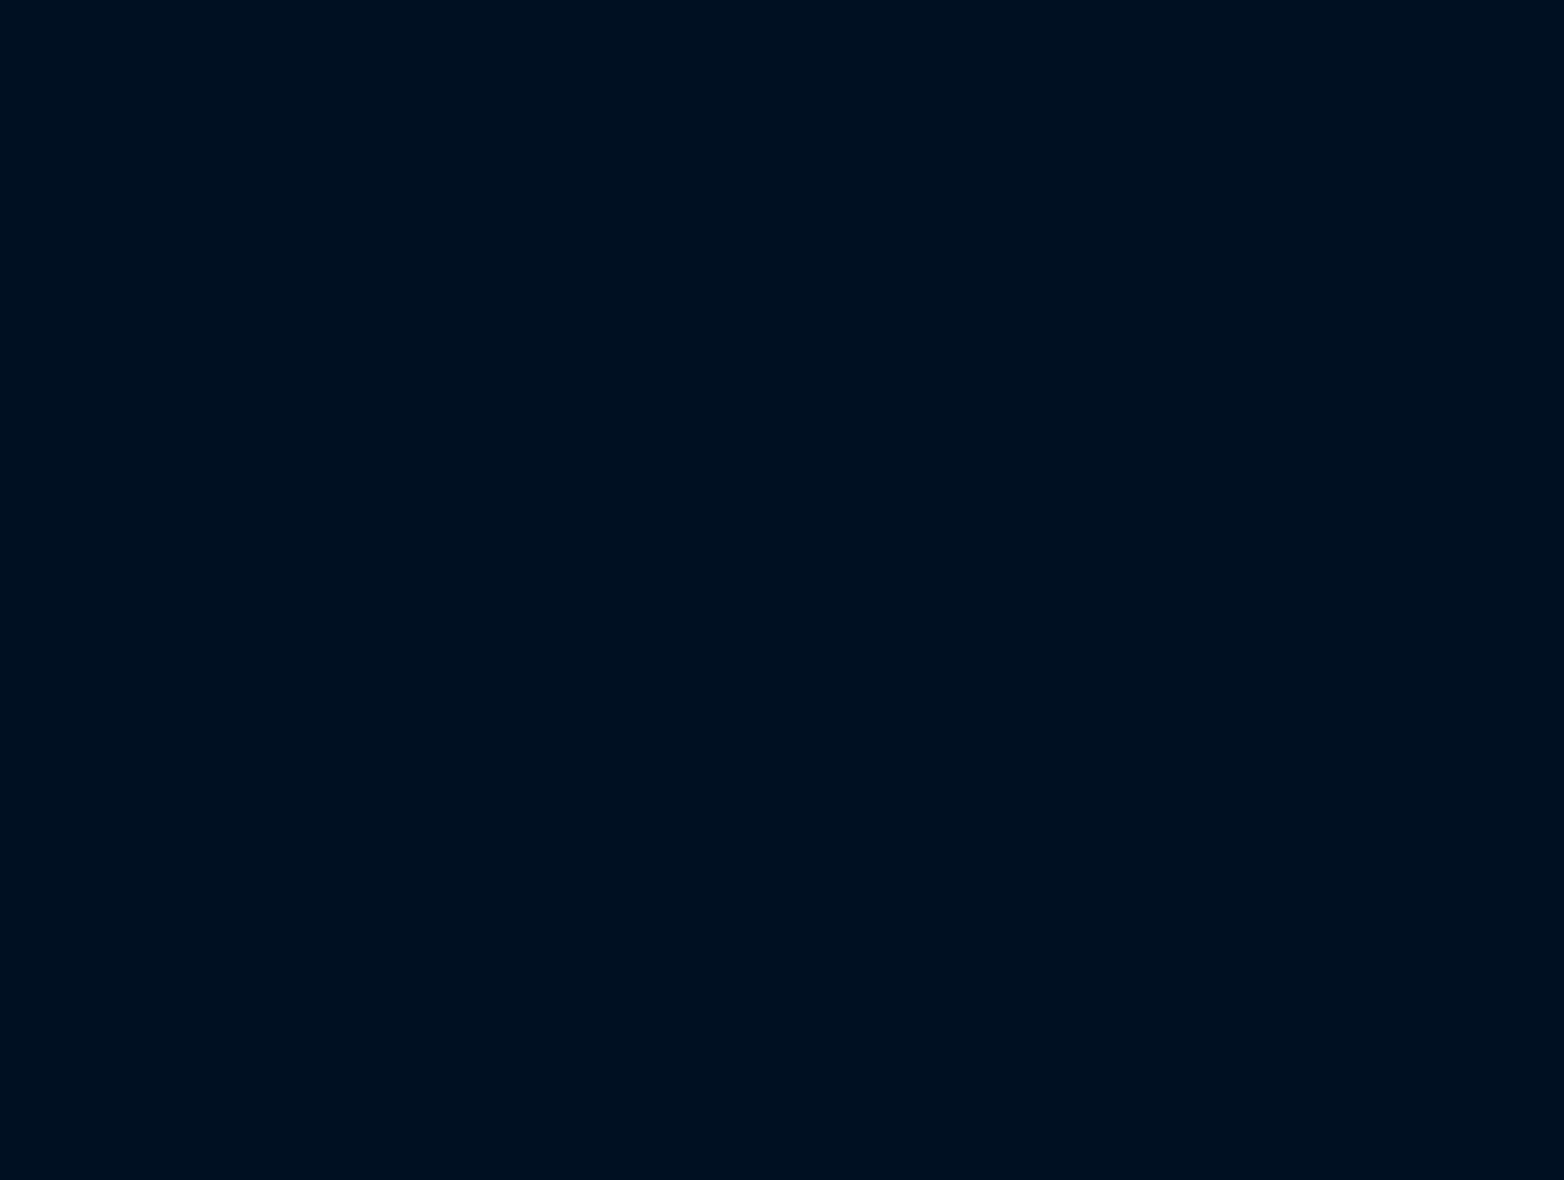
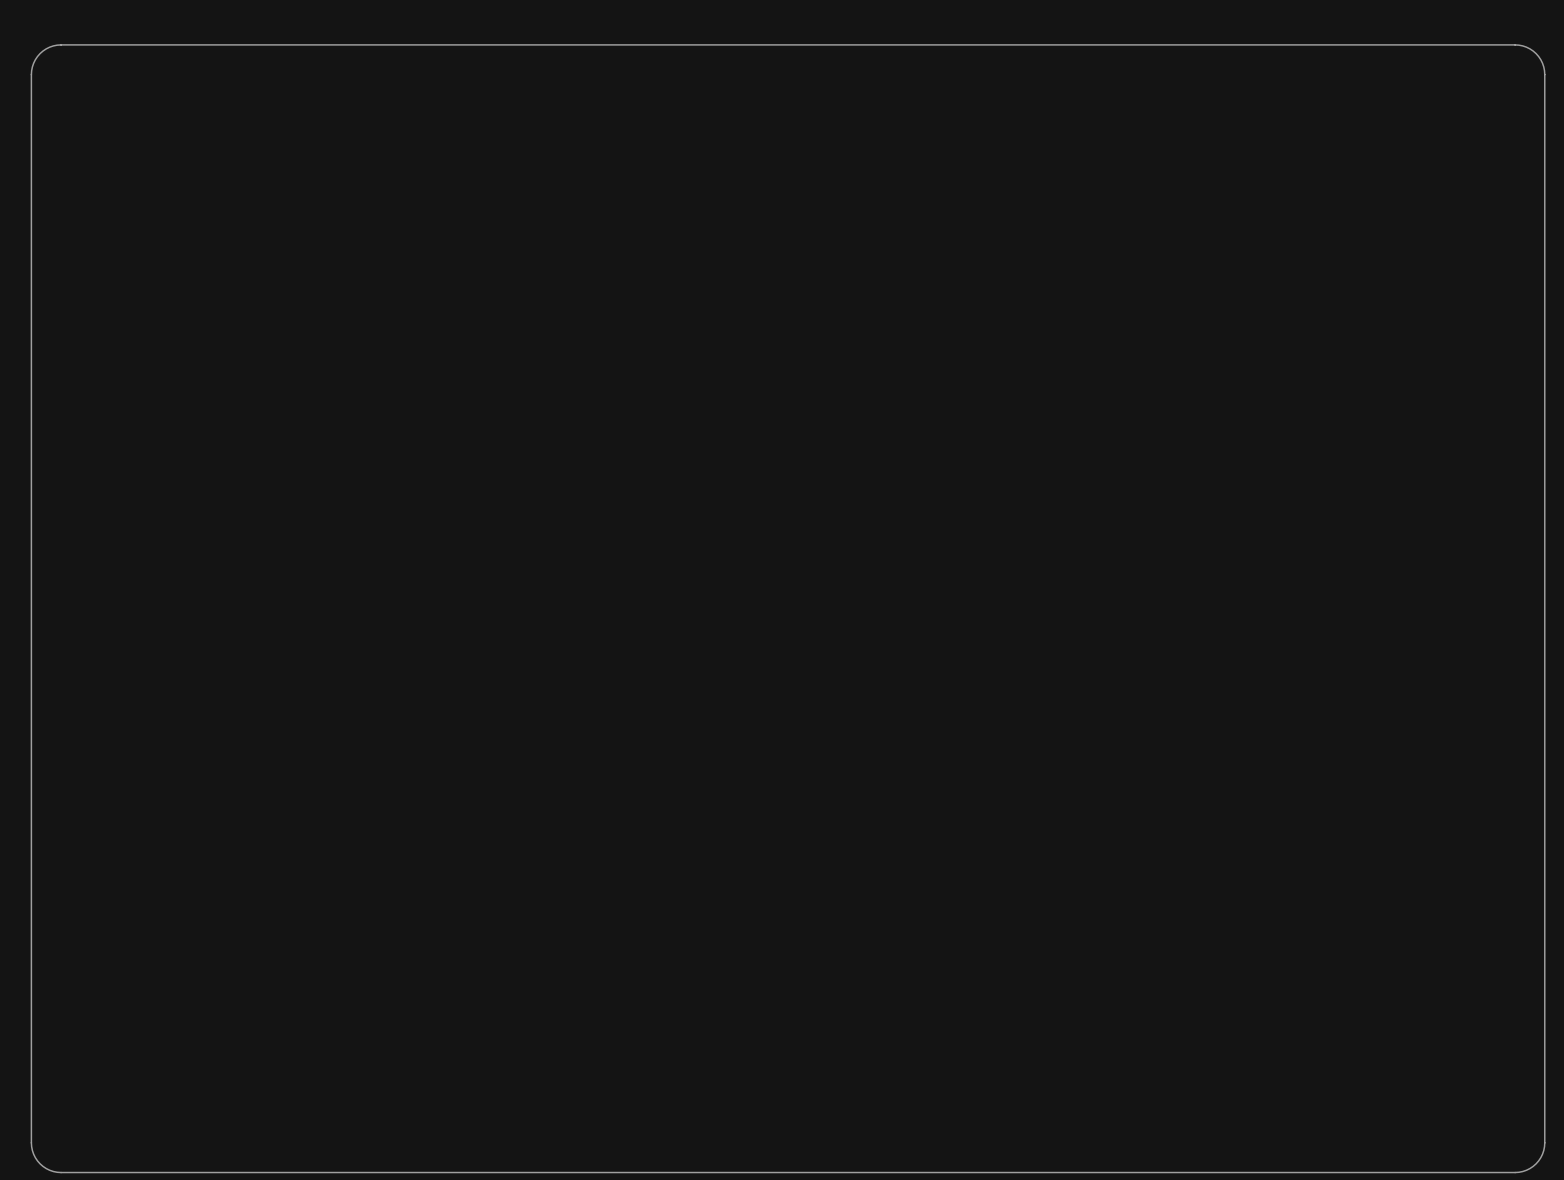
board edge: none -> (61, 44) (1515, 44) (1522, 45) (1533, 51) (1542, 63) (1544, 74) (1544, 1142) (1543, 1150) (1538, 1160) (1526, 1170) (1515, 1172) (61, 1172) (53, 1171) (43, 1166) (33, 1154) (31, 1142) (31, 74) (33, 63) (40, 53) (49, 47) (61, 44)

